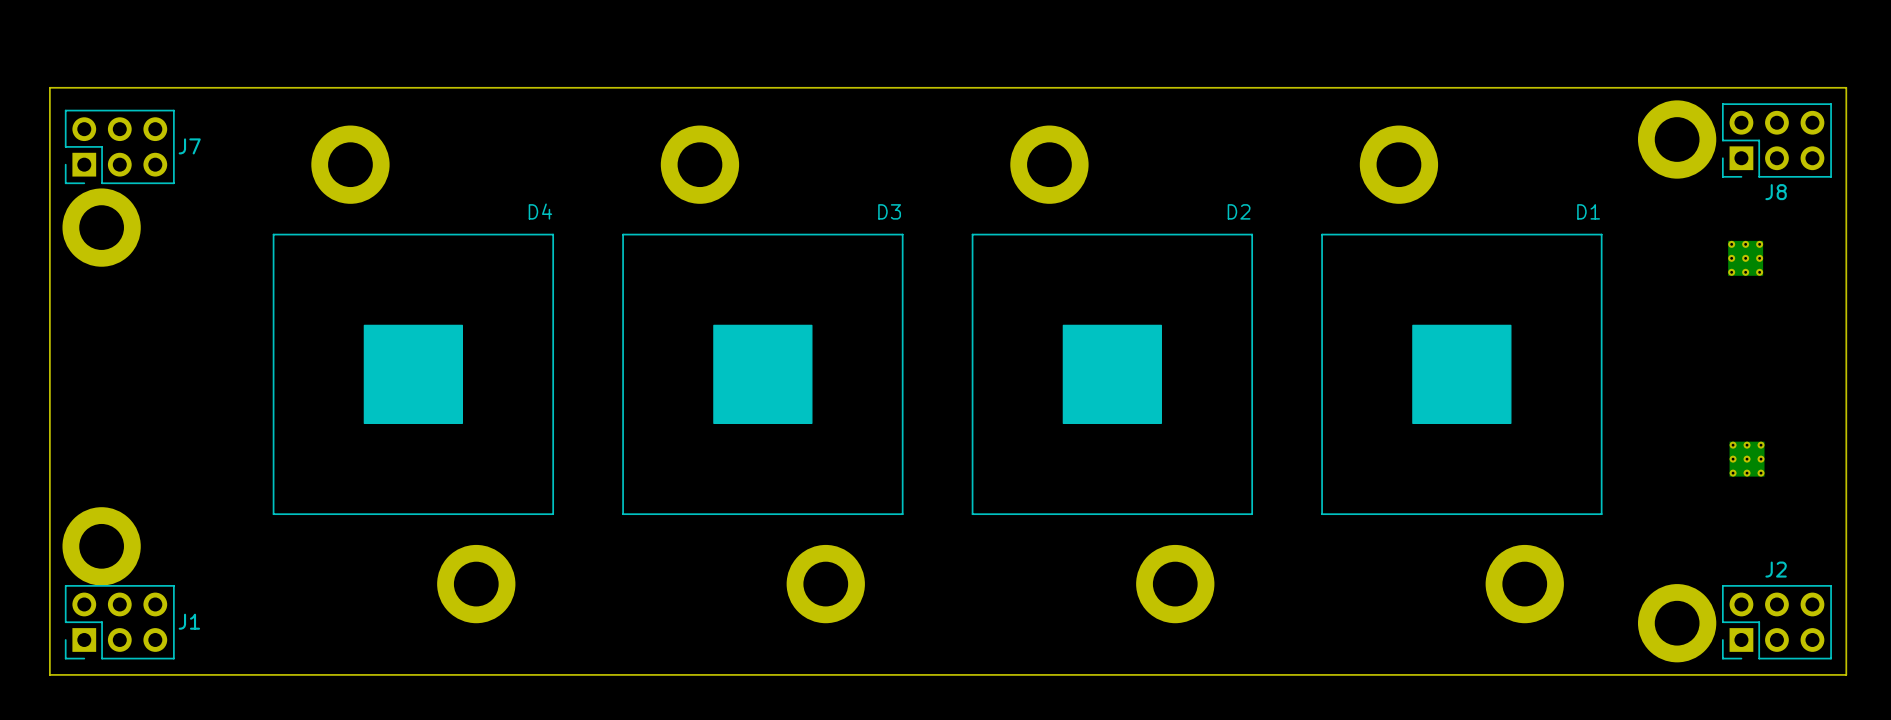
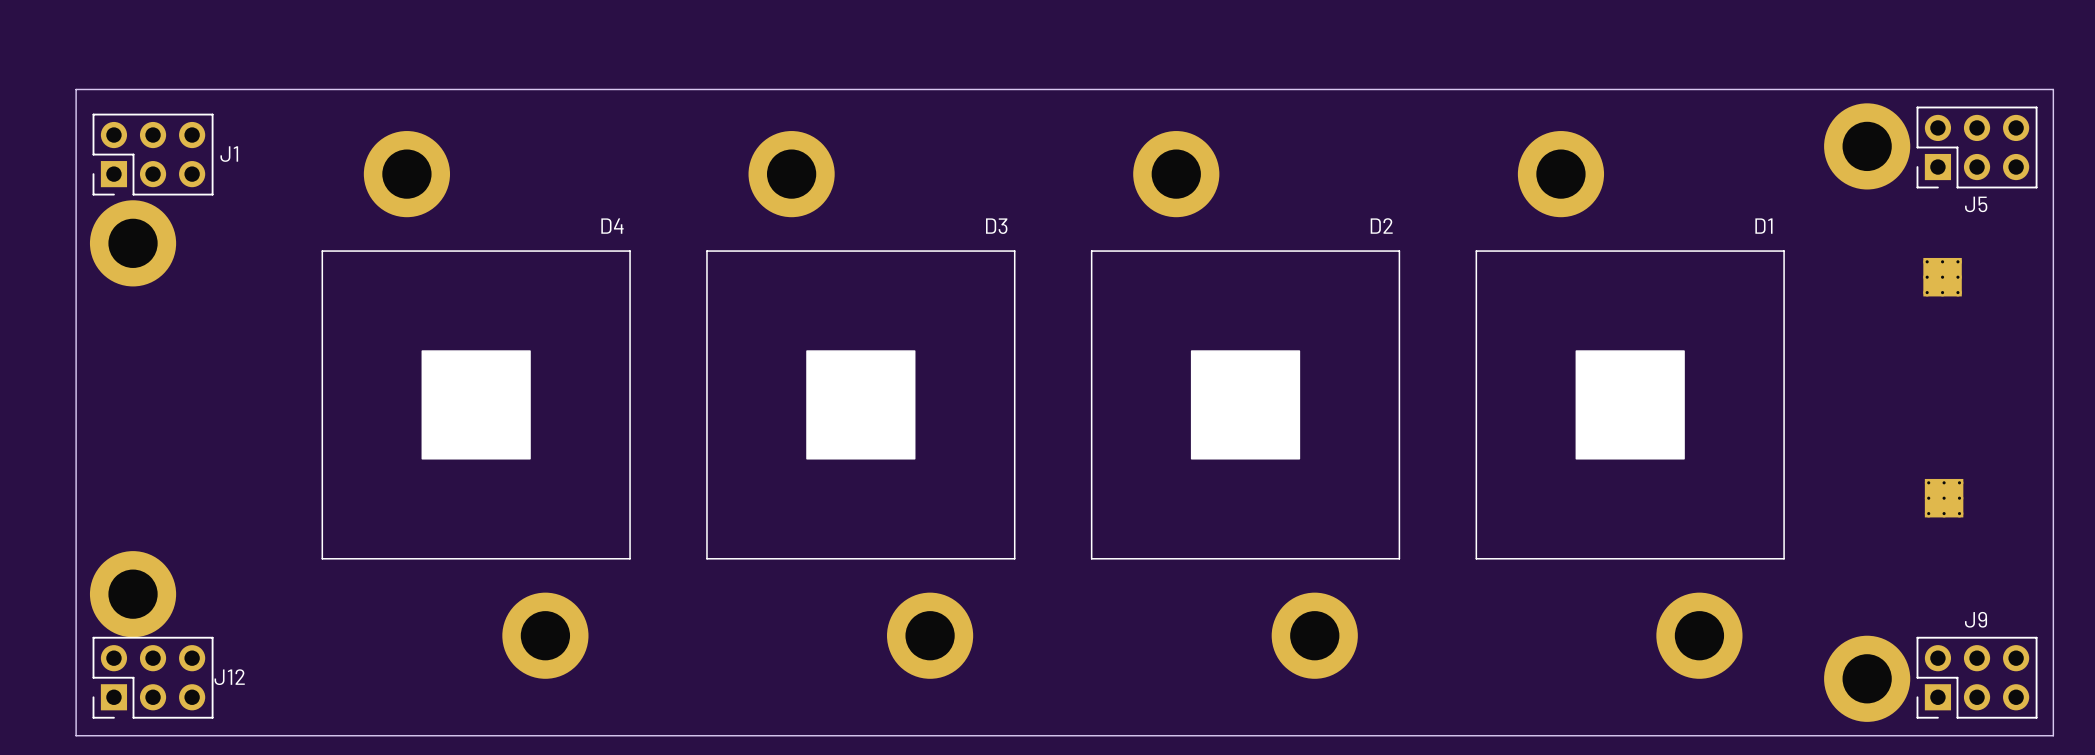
J7 name: J7 (189, 146) -> J1 (229, 154)
J8 name: J8 (1776, 192) -> J5 (1976, 204)
J2 name: J2 (1776, 569) -> J9 (1976, 619)
J1 name: J1 (189, 621) -> J12 (229, 677)

